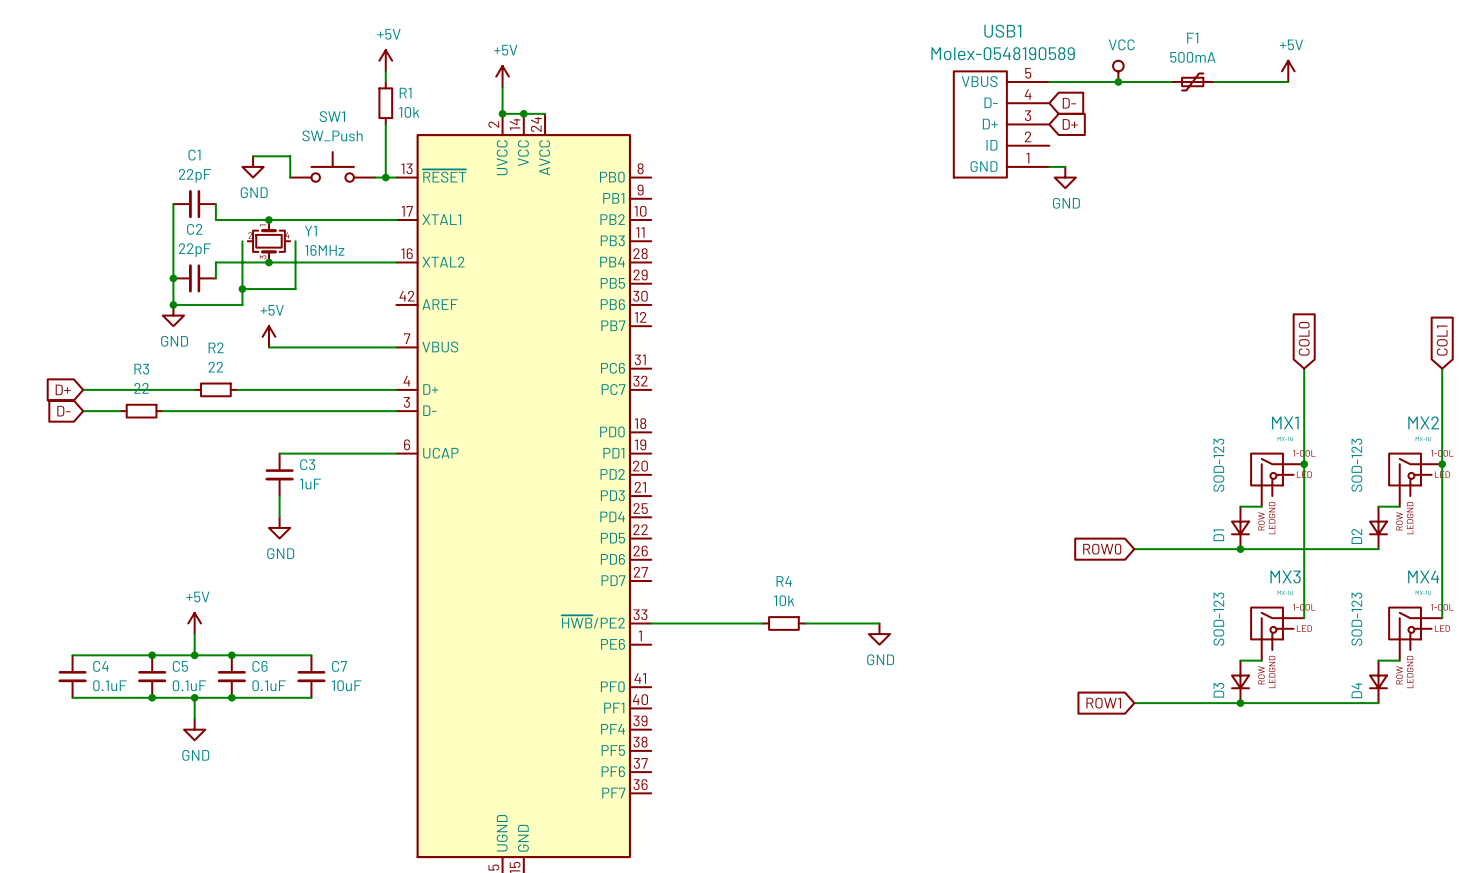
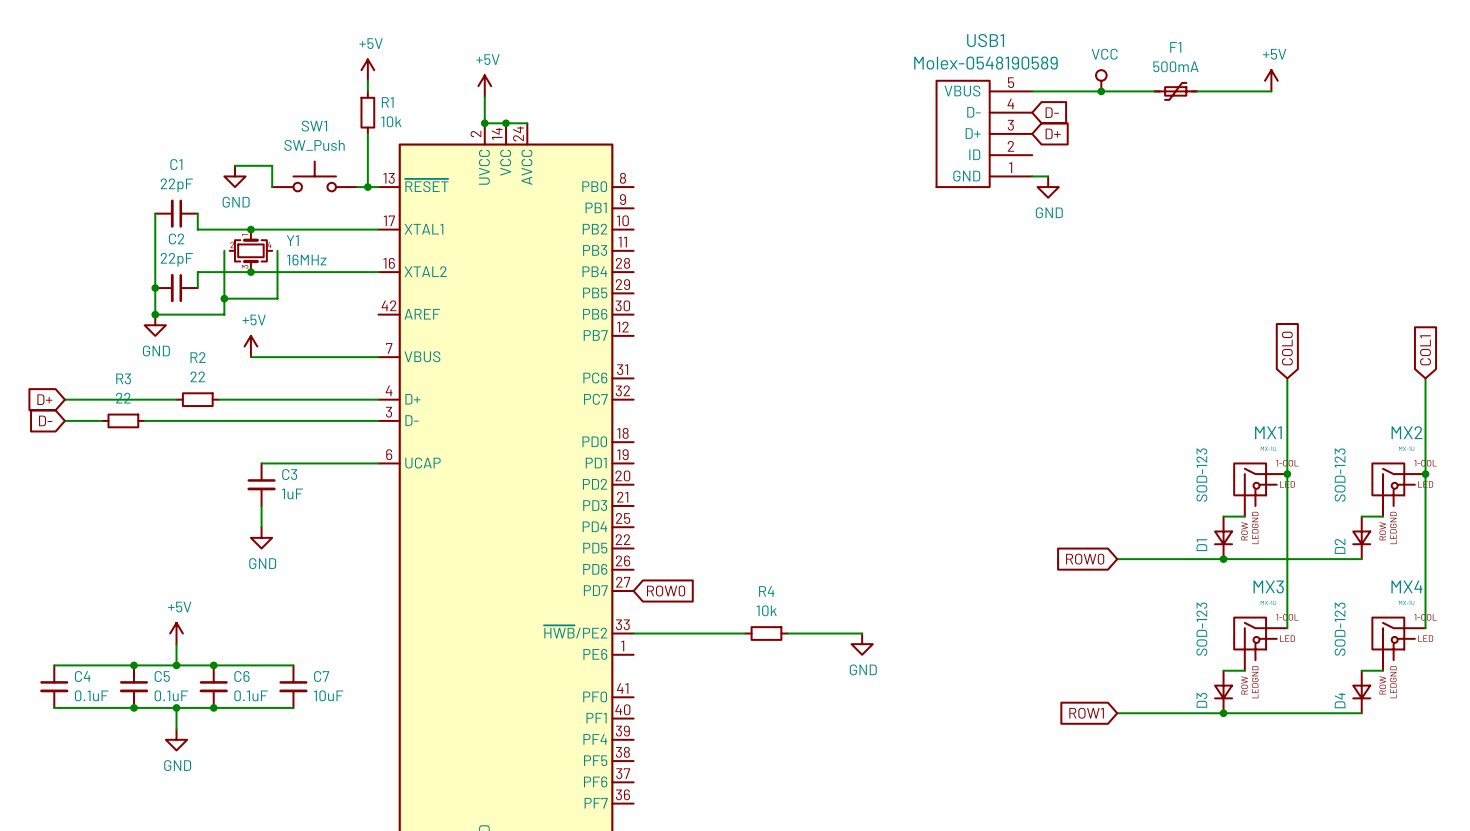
global label: none -> ROW0 (666, 591)

